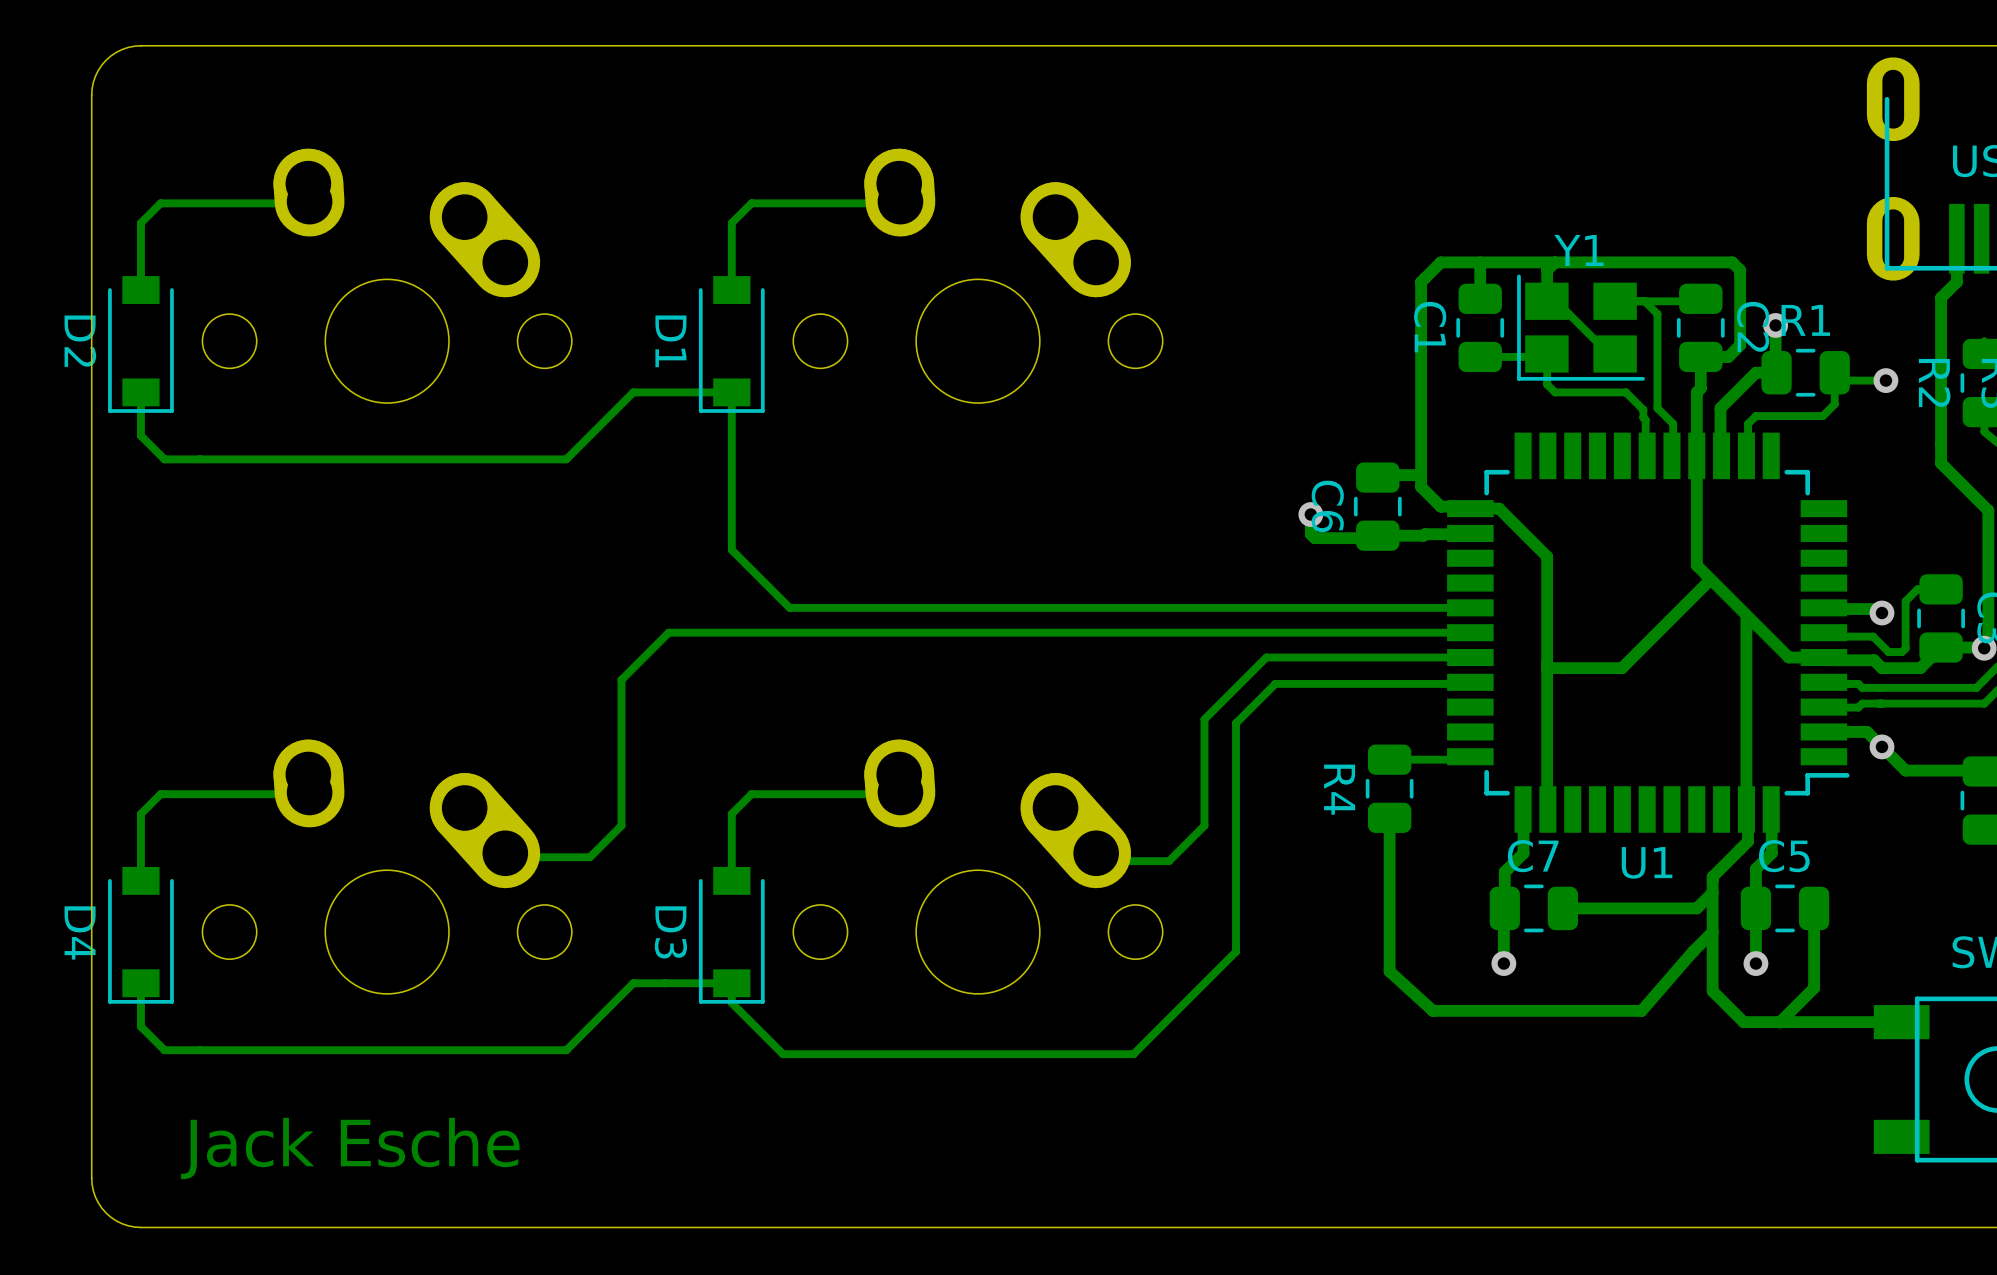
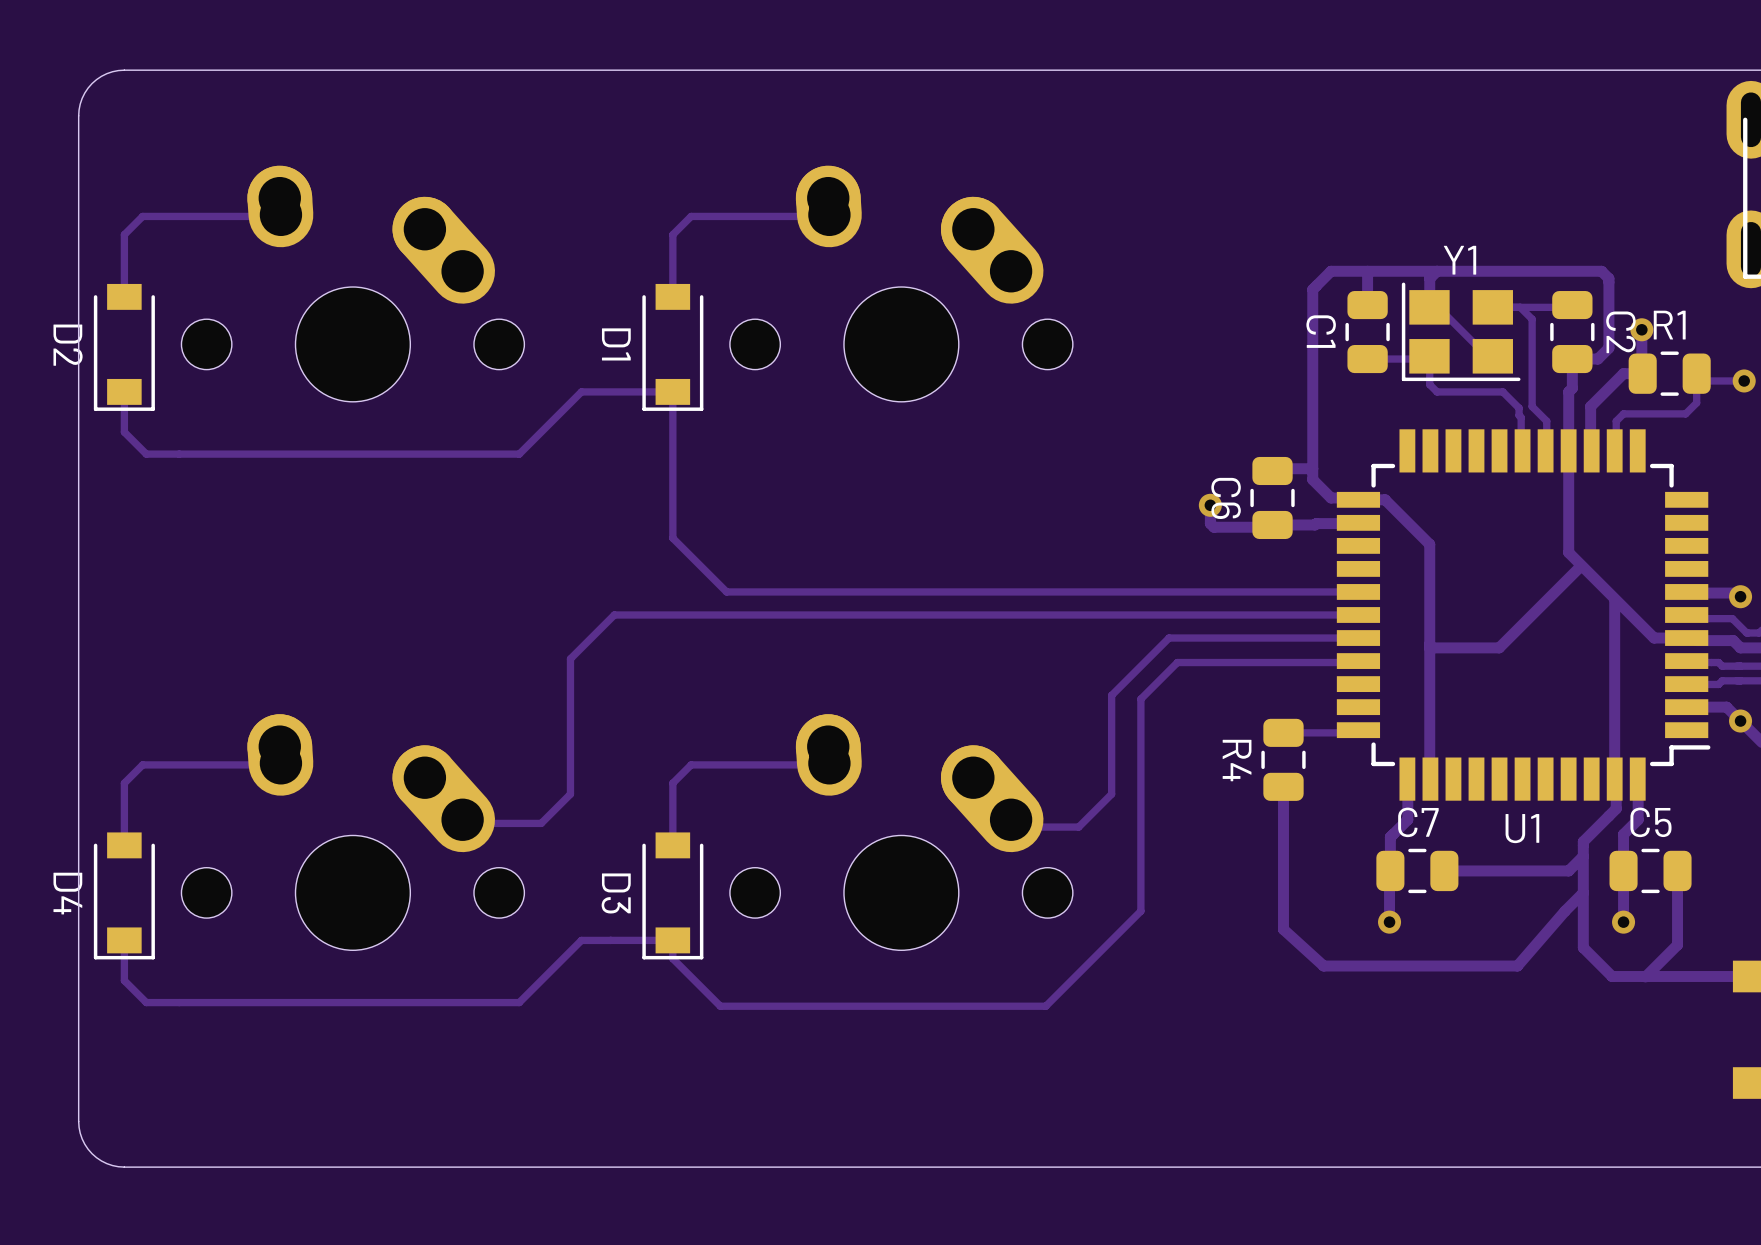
text: Jack Esche (350, 1148) -> none

